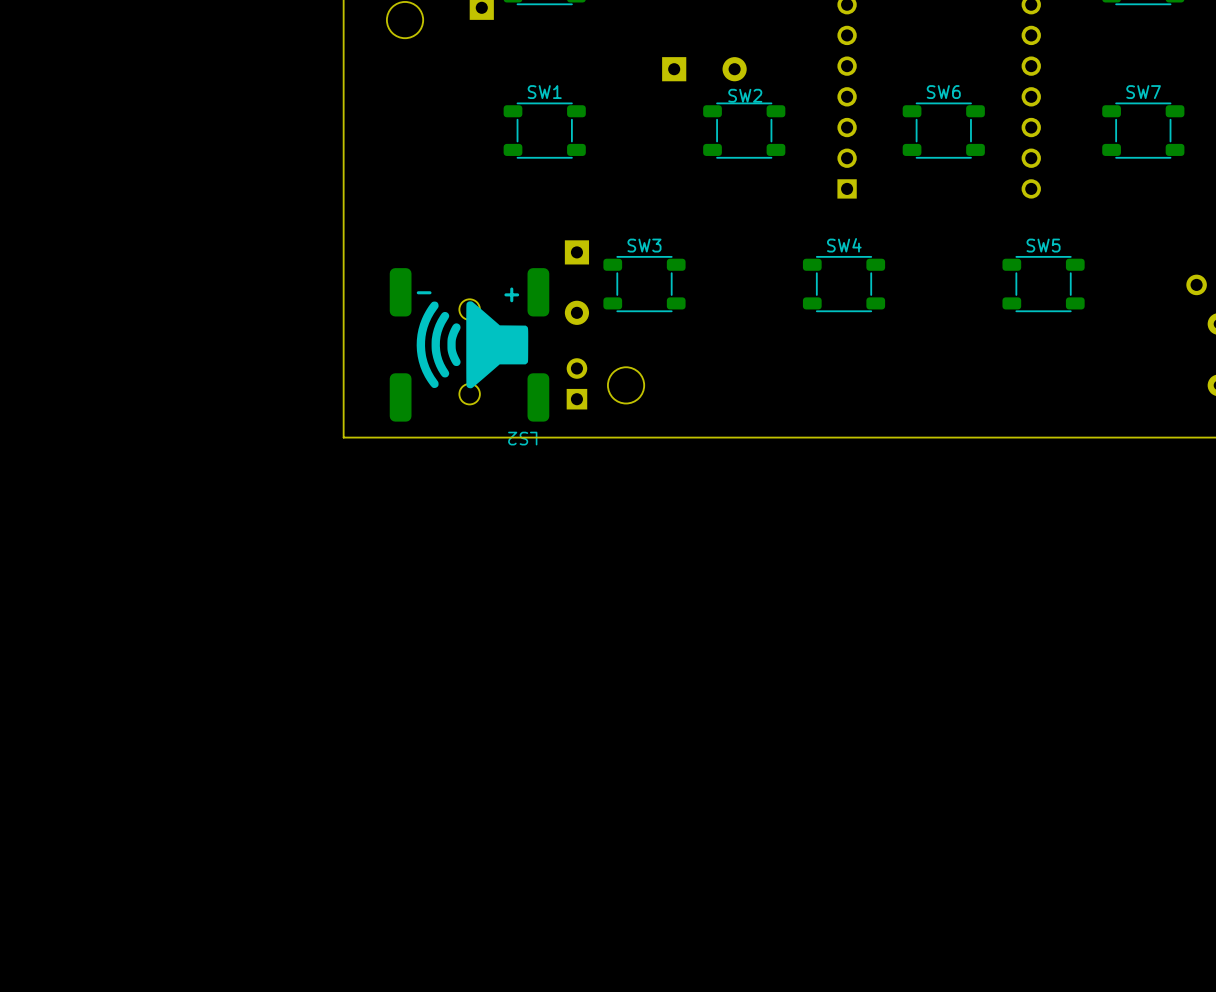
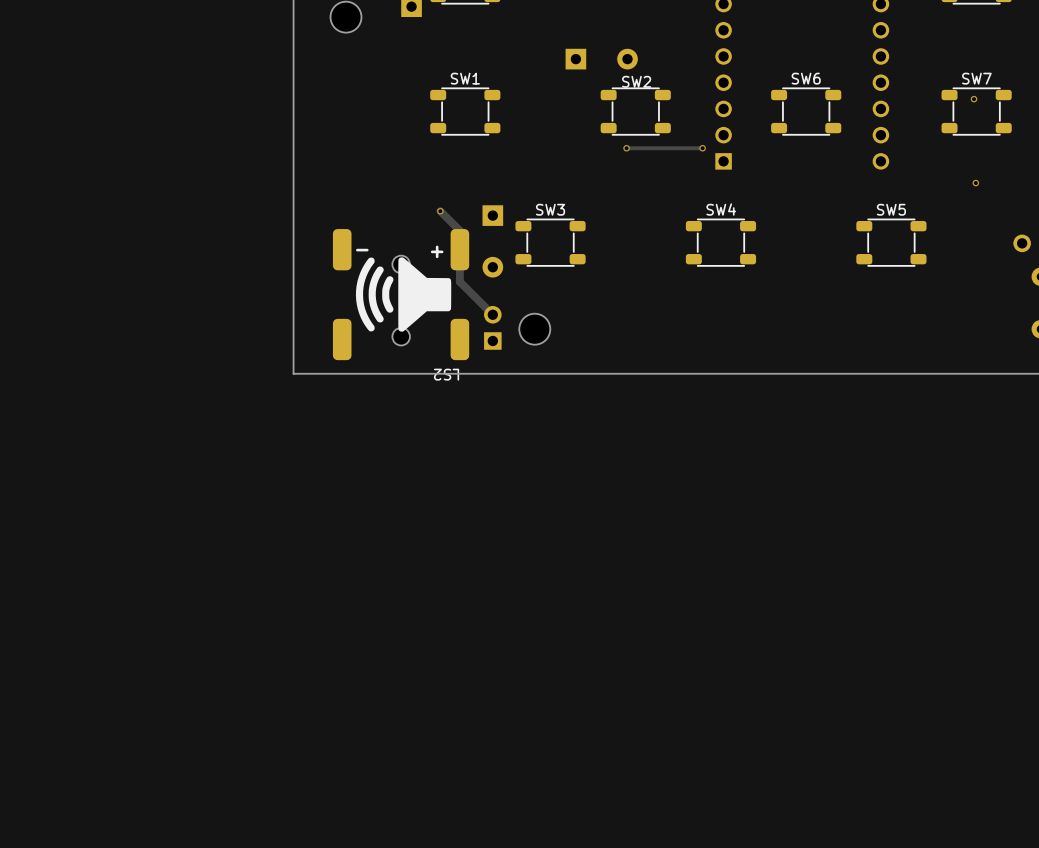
via: none -> (974, 99)
via: none -> (626, 148)
track: none -> (702, 148) (626, 148)
via: none -> (702, 148)
via: none -> (975, 183)
track: none -> (440, 211) (459, 230) (459, 281) (492, 314)
via: none -> (440, 211)

